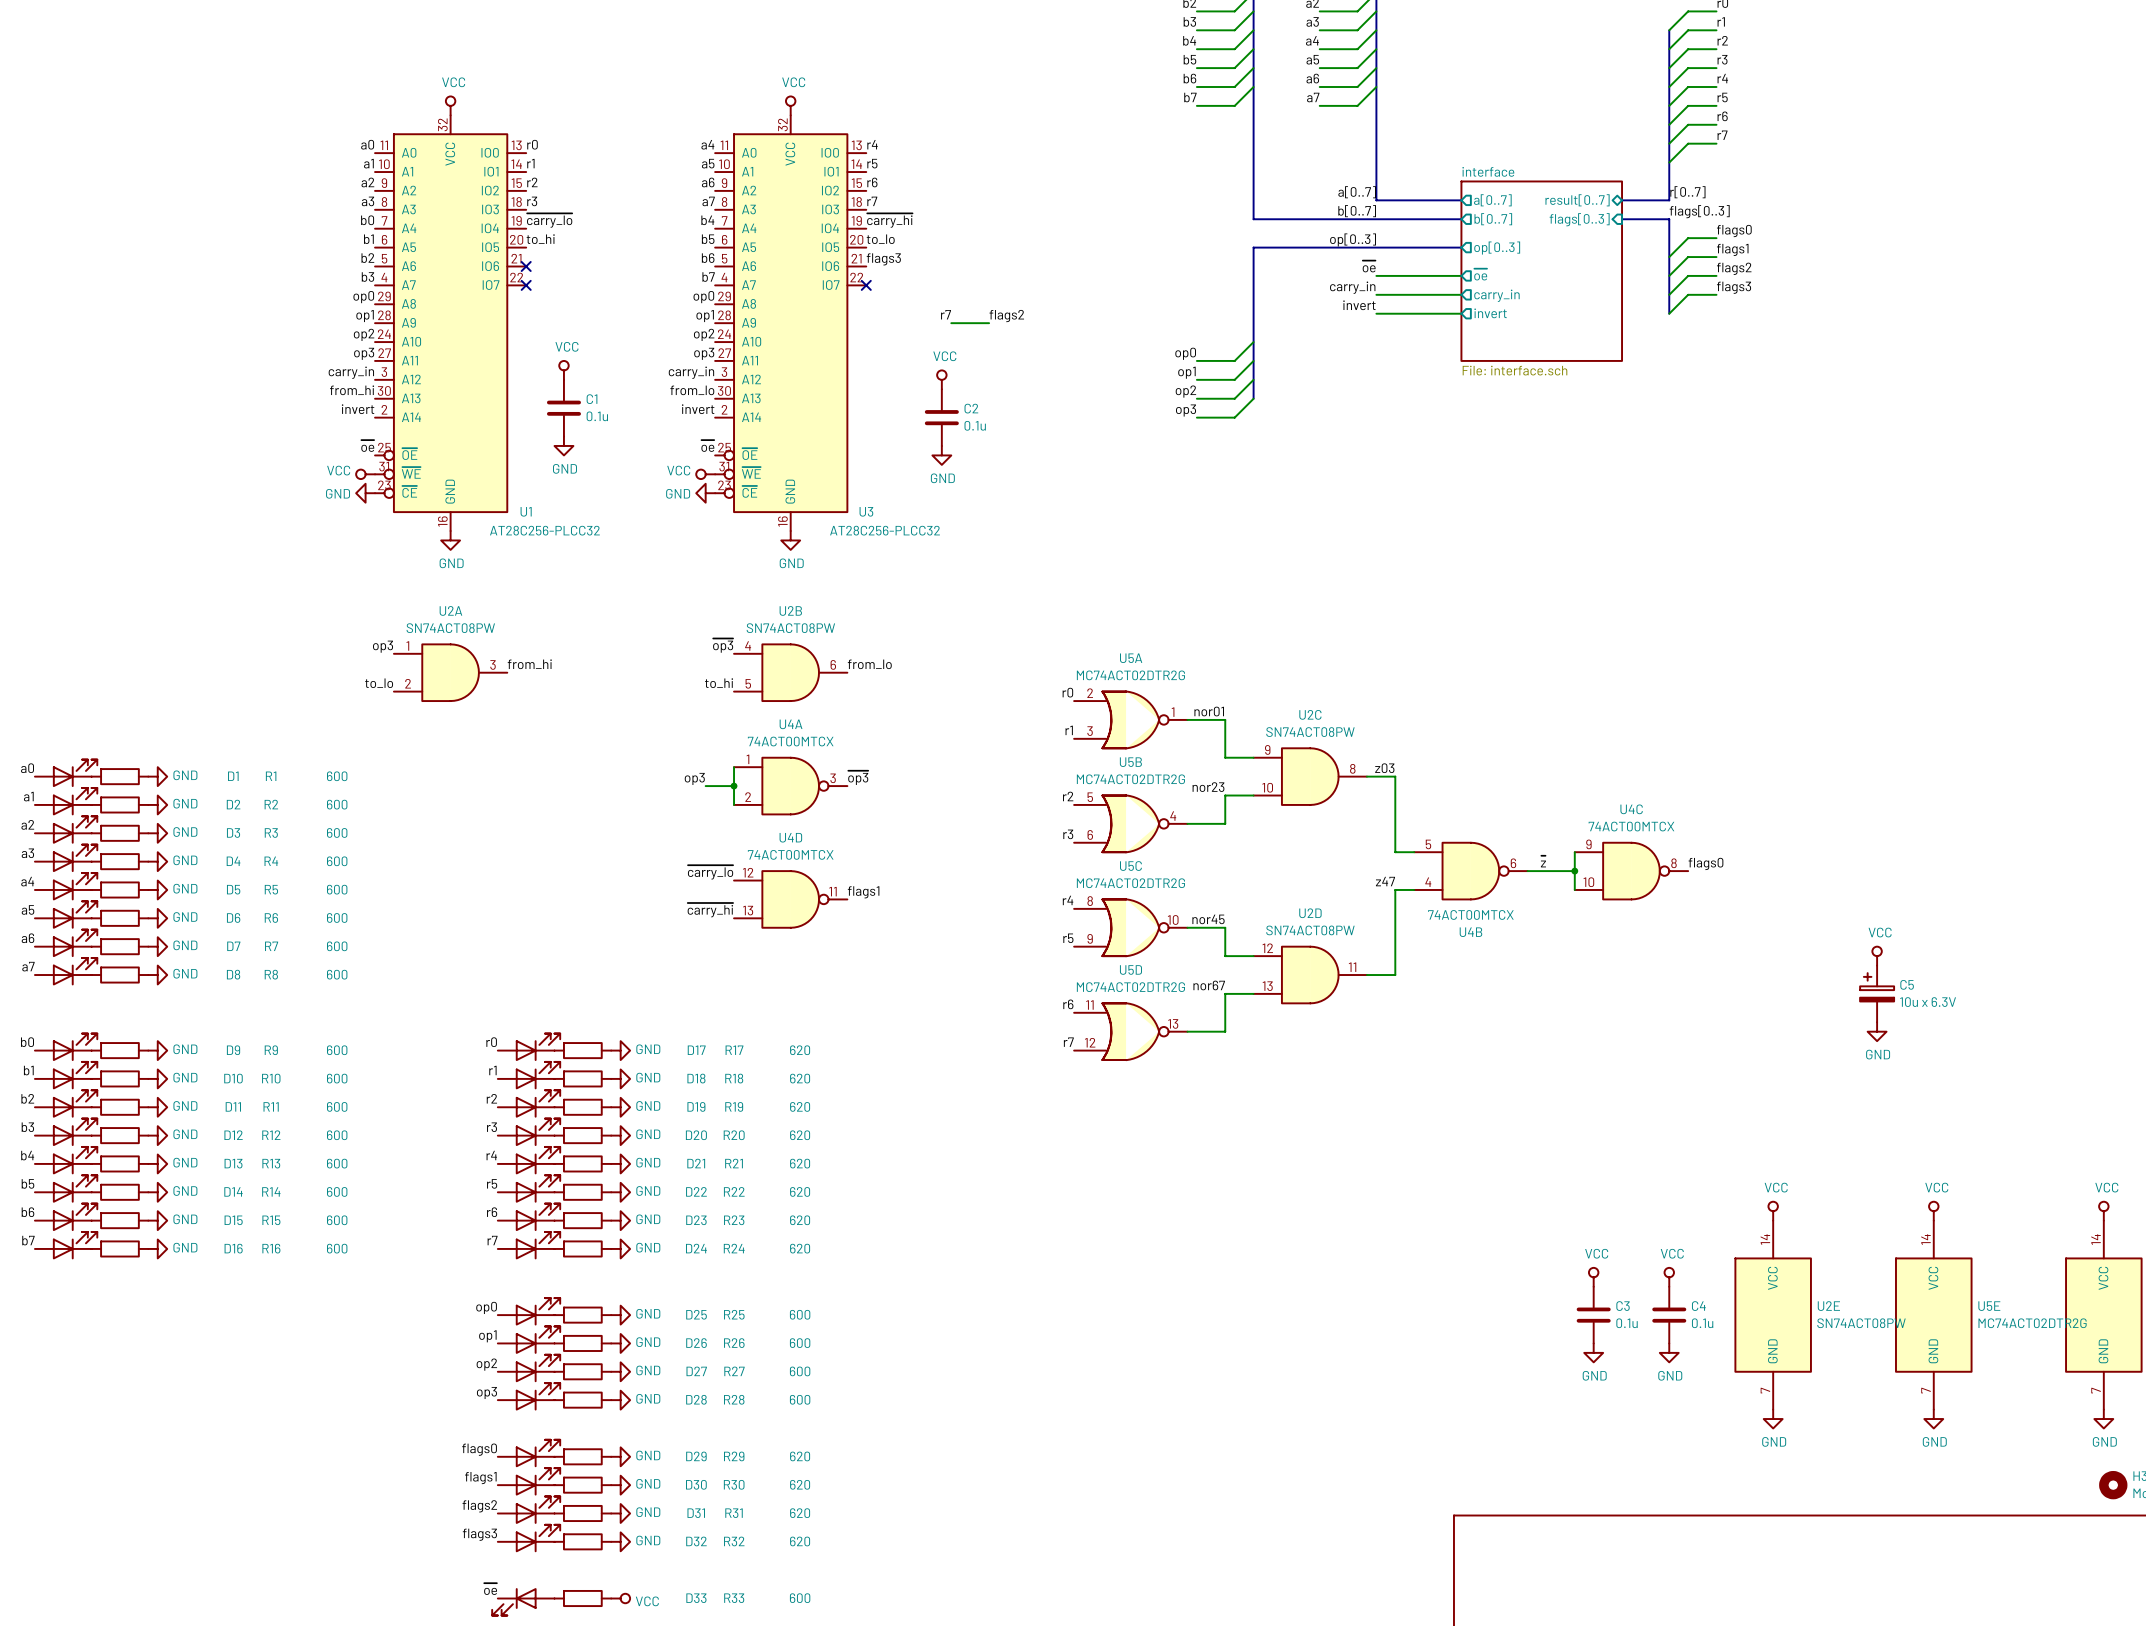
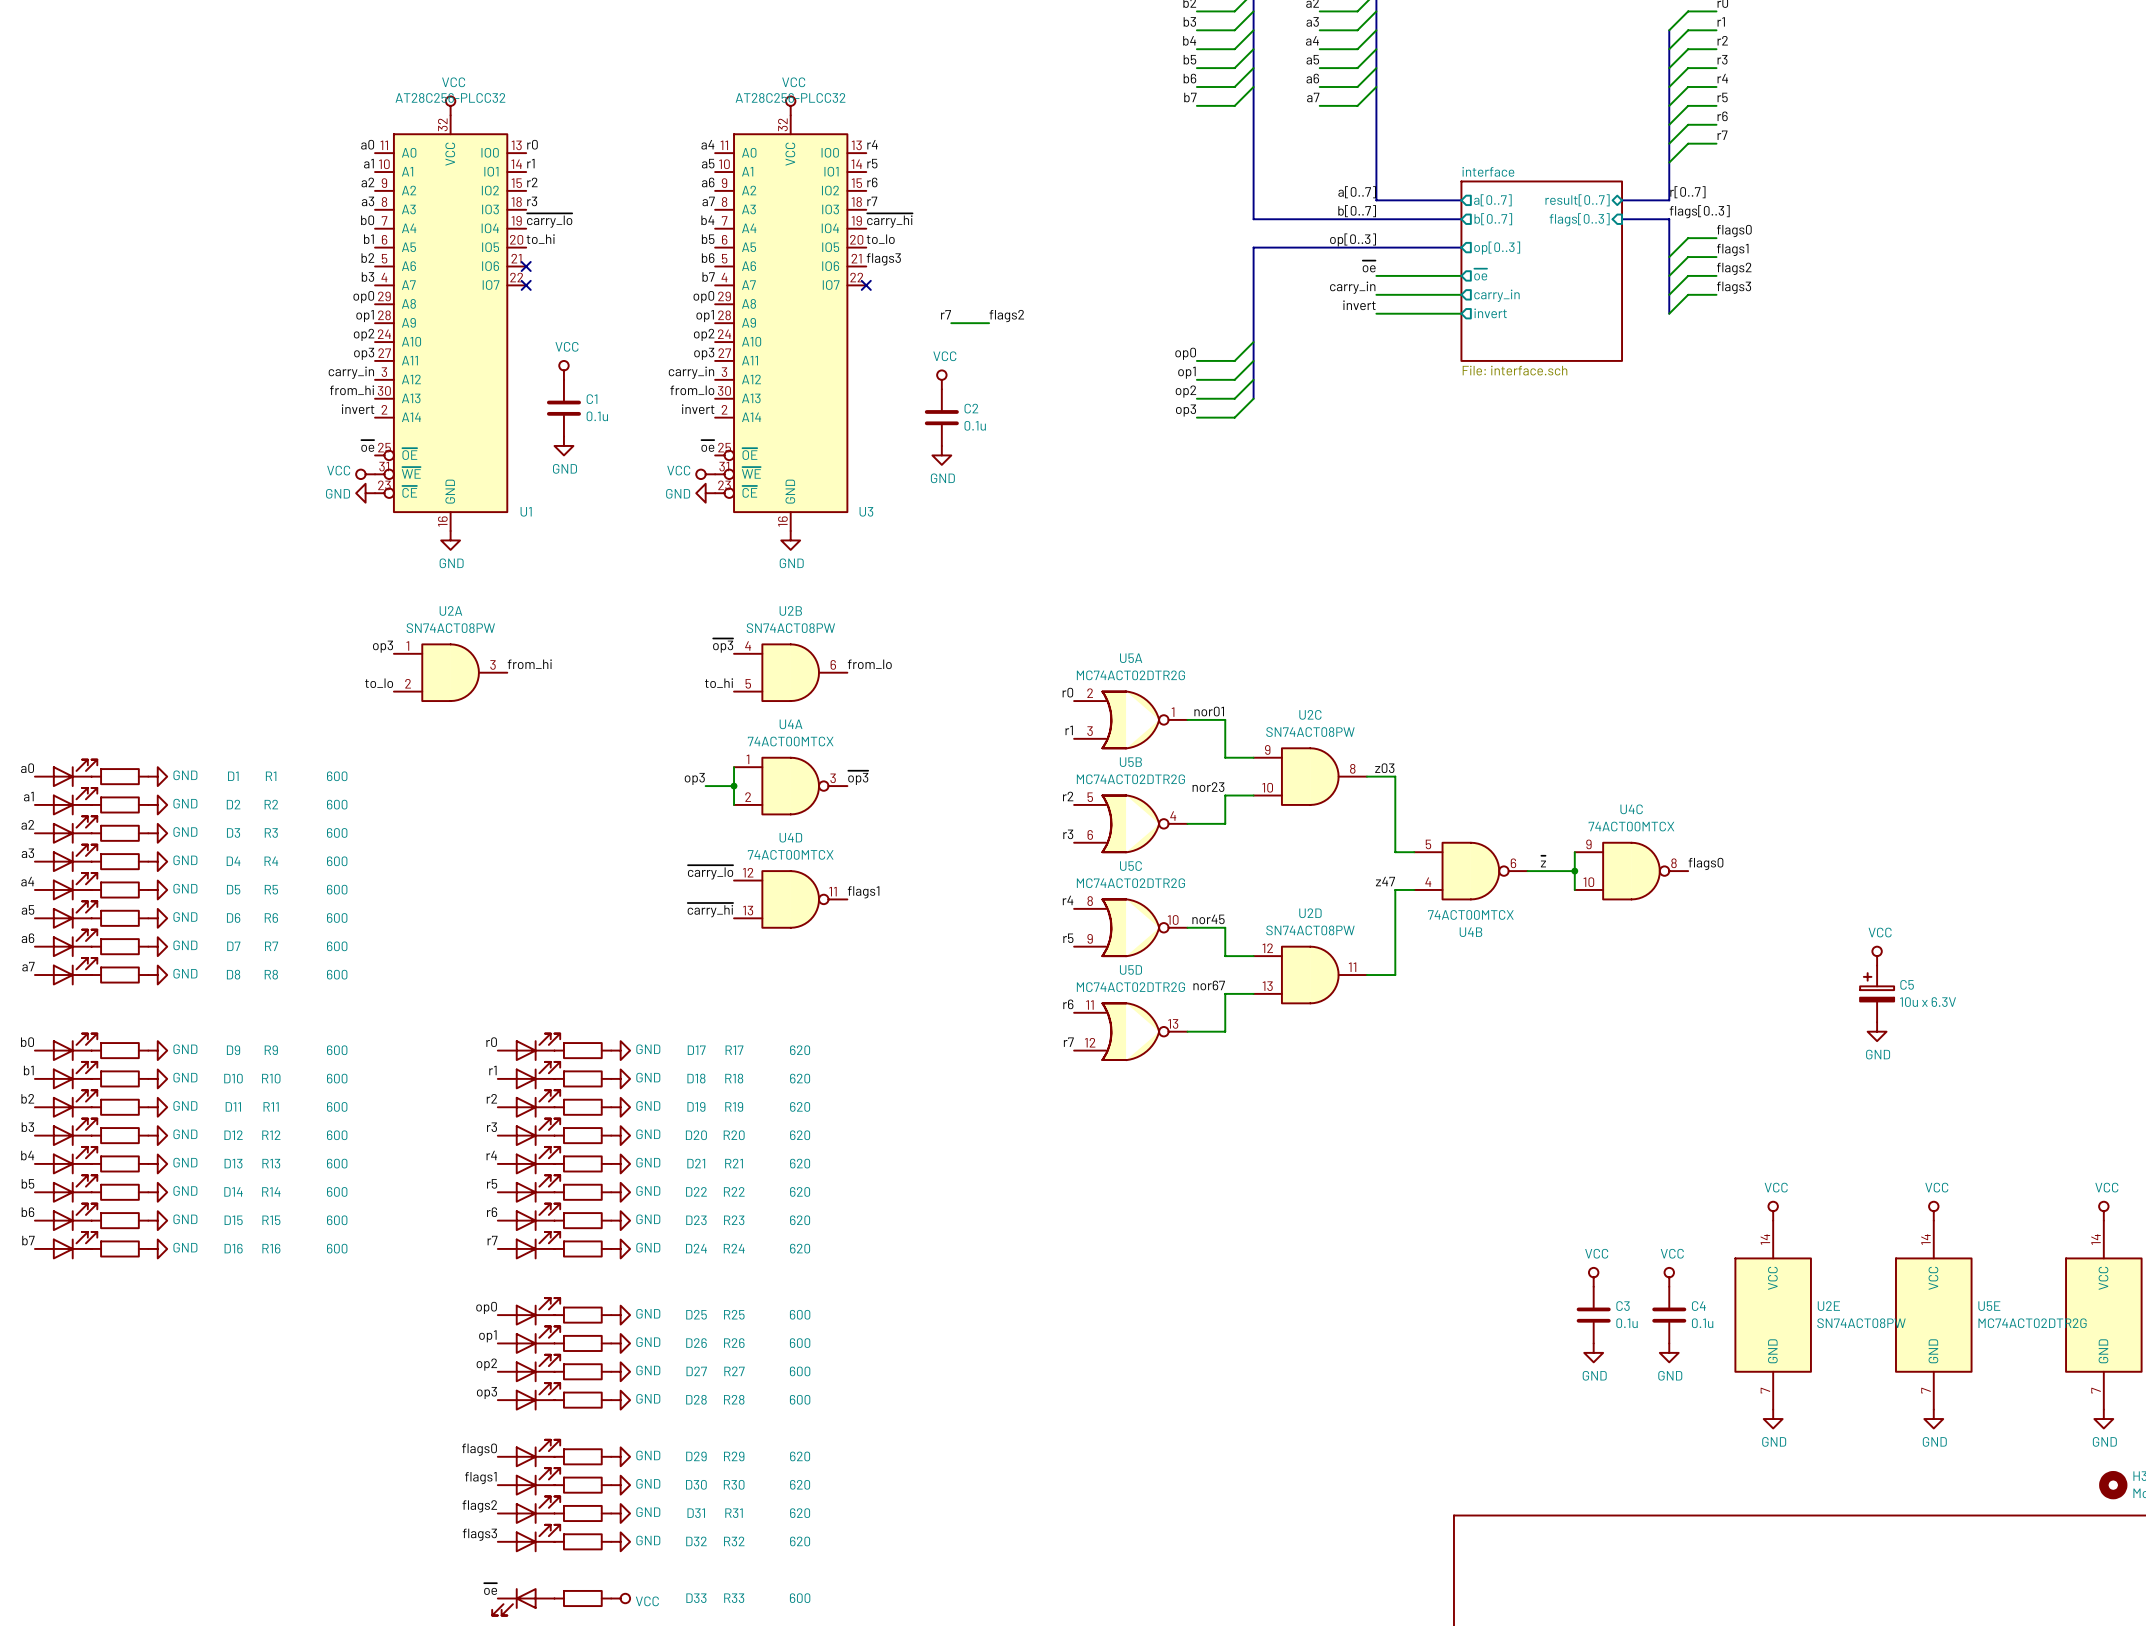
U1 value position: AT28C256-PLCC32 (544, 530) -> AT28C256-PLCC32 (450, 97)
U3 value position: AT28C256-PLCC32 (884, 530) -> AT28C256-PLCC32 (790, 97)

